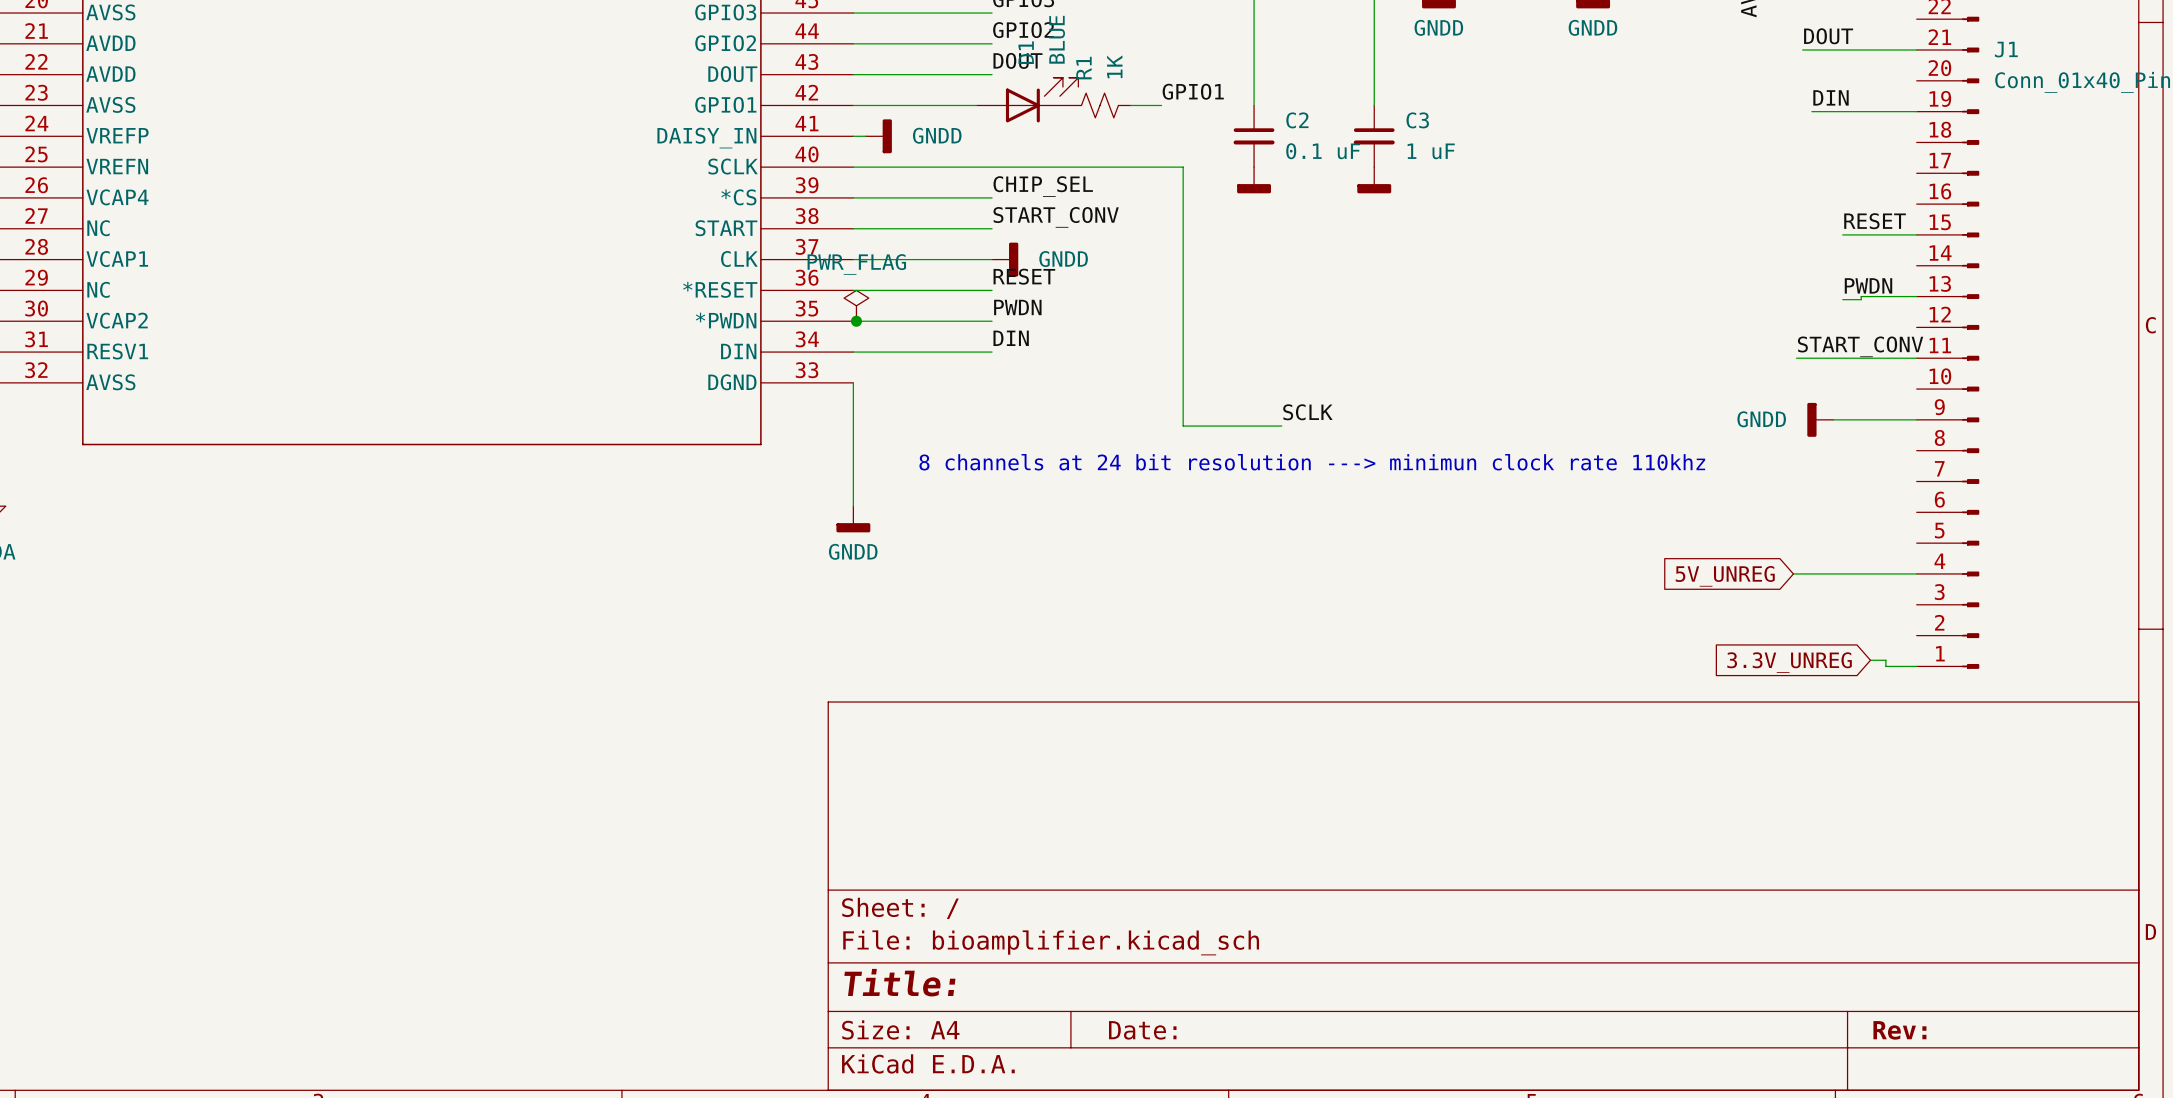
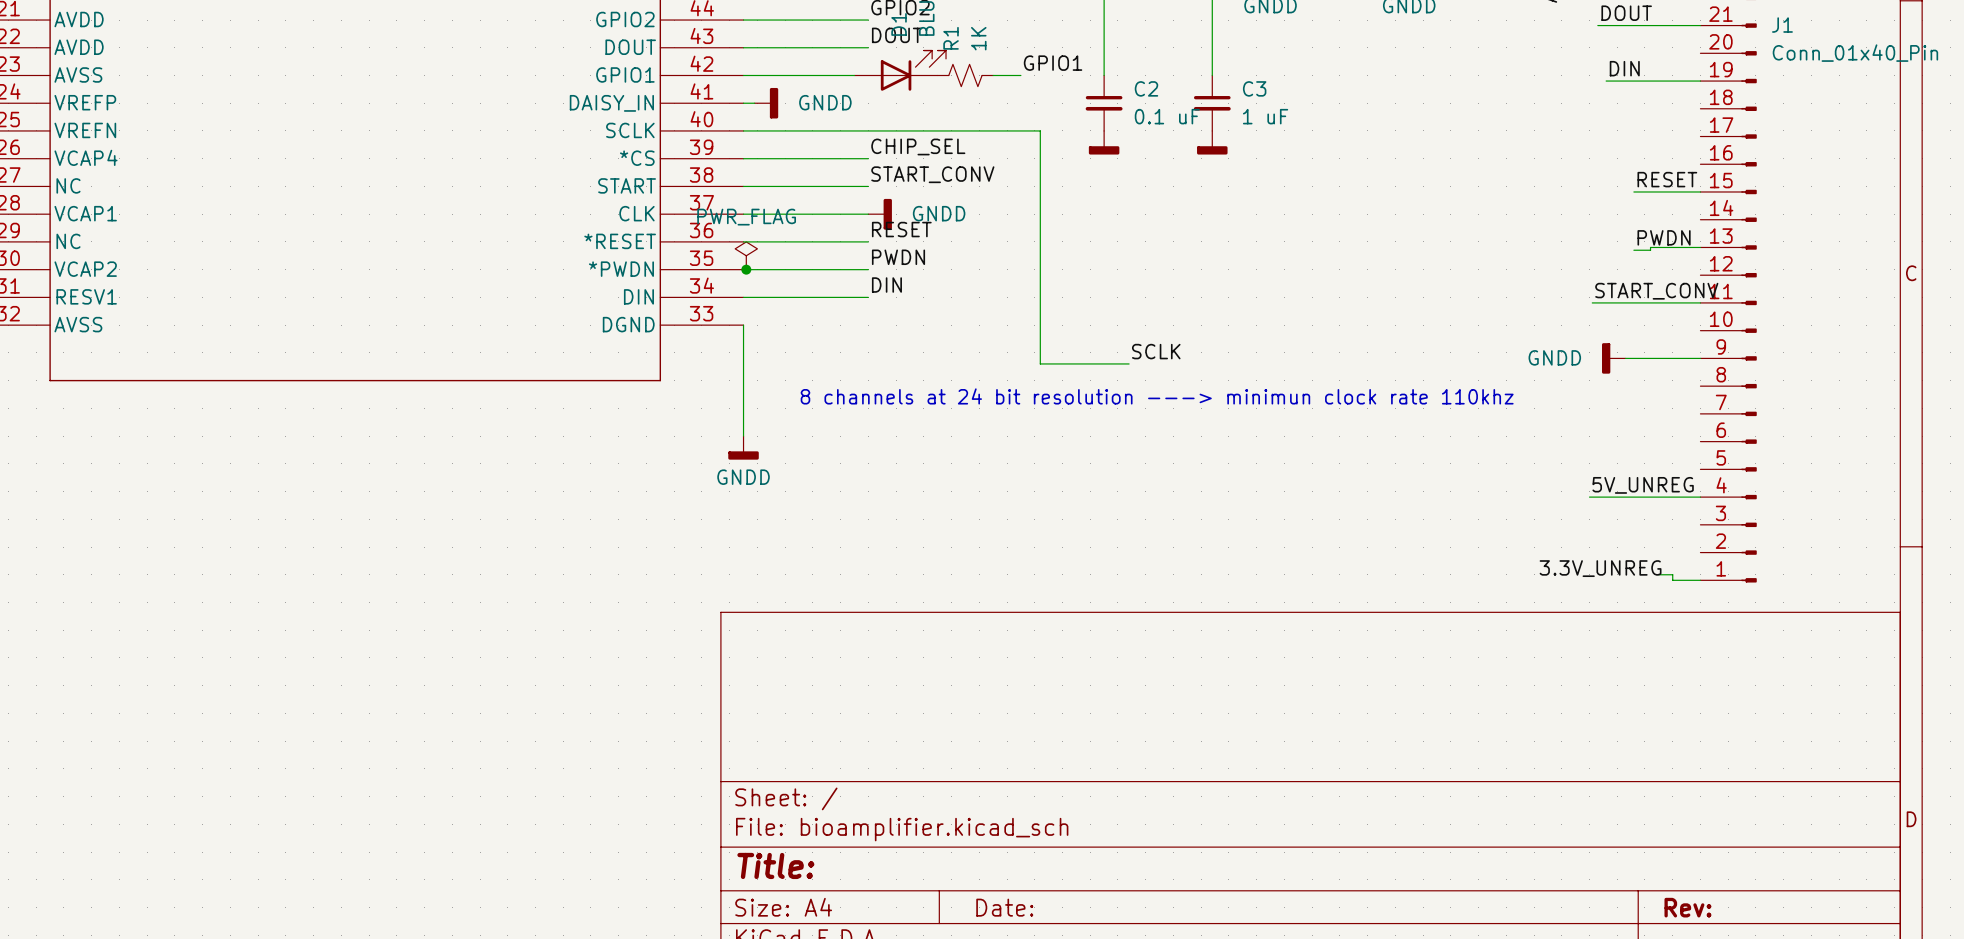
label: none -> 5V_UNREG (1643, 485)
global label: 5V_UNREG (1725, 576) -> none
label: none -> 3.3V_UNREG (1600, 568)
global label: 3.3V_UNREG (1789, 662) -> none

